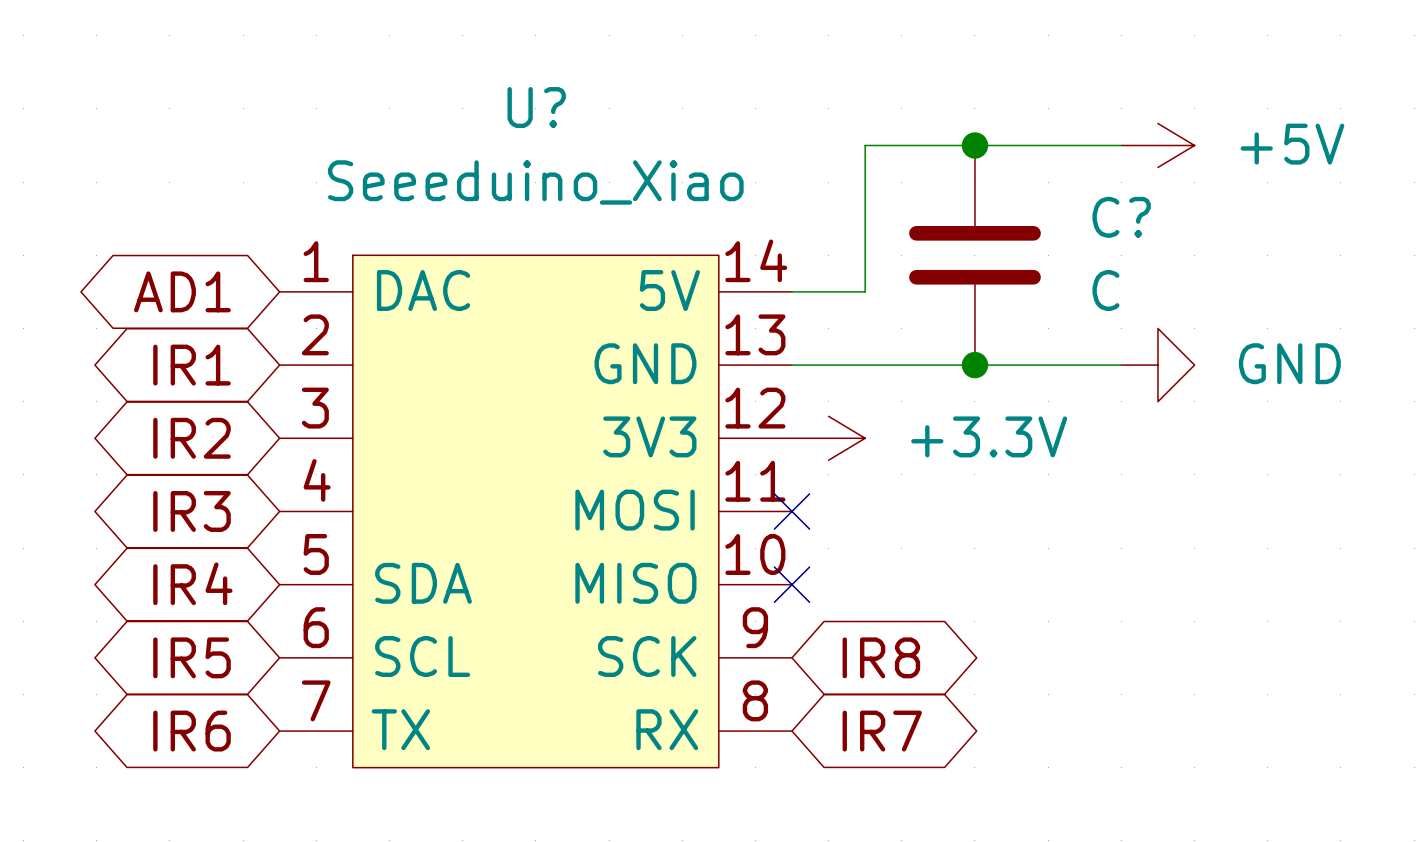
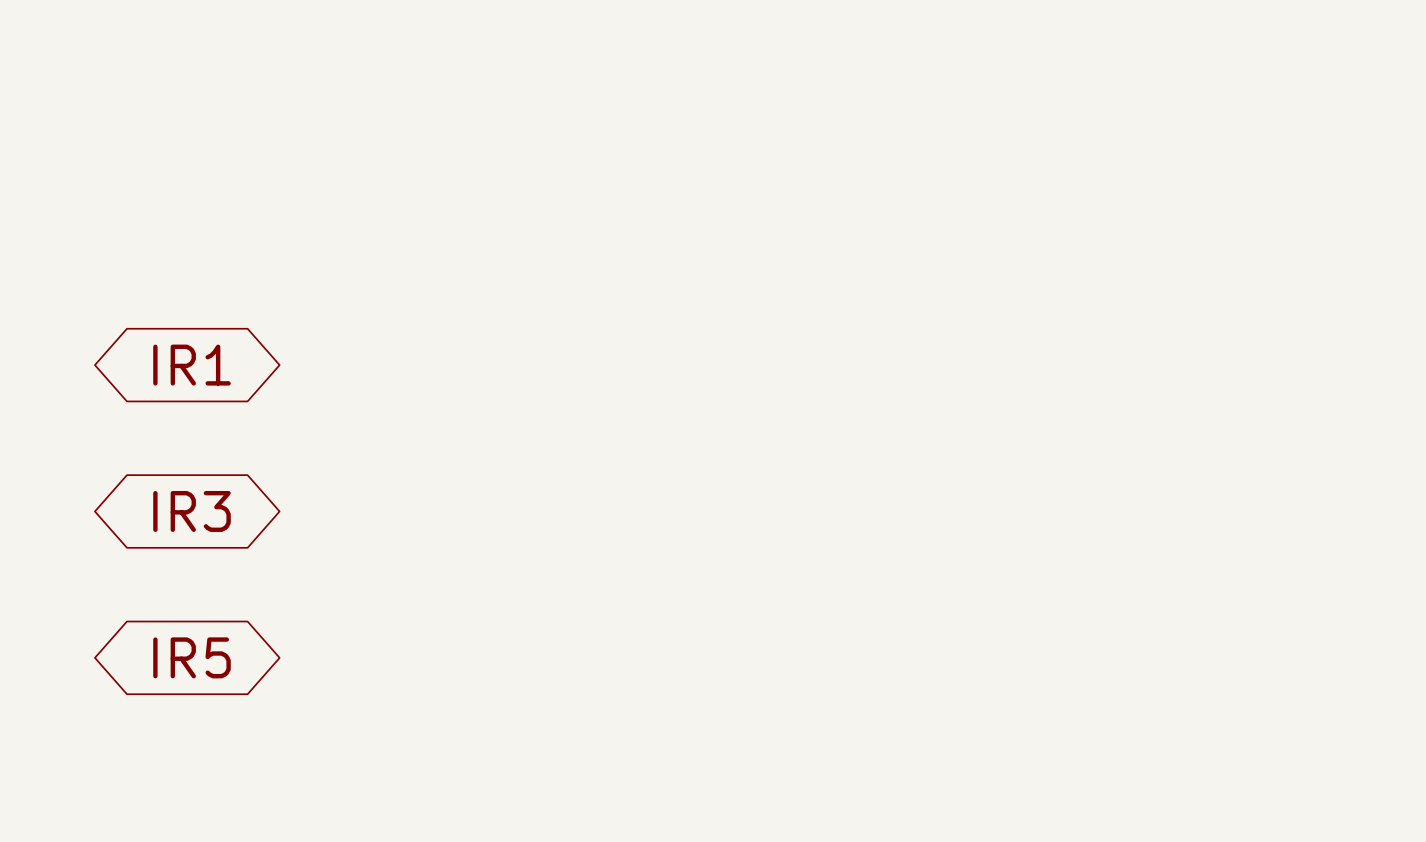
junction: (974, 145) -> none
wire: (1121, 145) (865, 145) (865, 291) (791, 291) -> none
power symbol: +5V (1157, 145) -> none
C?: C (974, 255) -> none
global label: AD1 (182, 291) -> none
wire: (791, 365) (1121, 365) -> none
junction: (974, 365) -> none
power symbol: GND (1157, 365) -> none
global label: IR2 (191, 438) -> none
power symbol: +3.3V (828, 438) -> none
U?: Seeeduino_Xiao (535, 511) -> none
no-connect mark: (791, 511) -> none
global label: IR4 (192, 583) -> none
no-connect mark: (791, 584) -> none
global label: IR8 (881, 657) -> none
global label: IR6 (191, 731) -> none
global label: IR7 (882, 731) -> none

